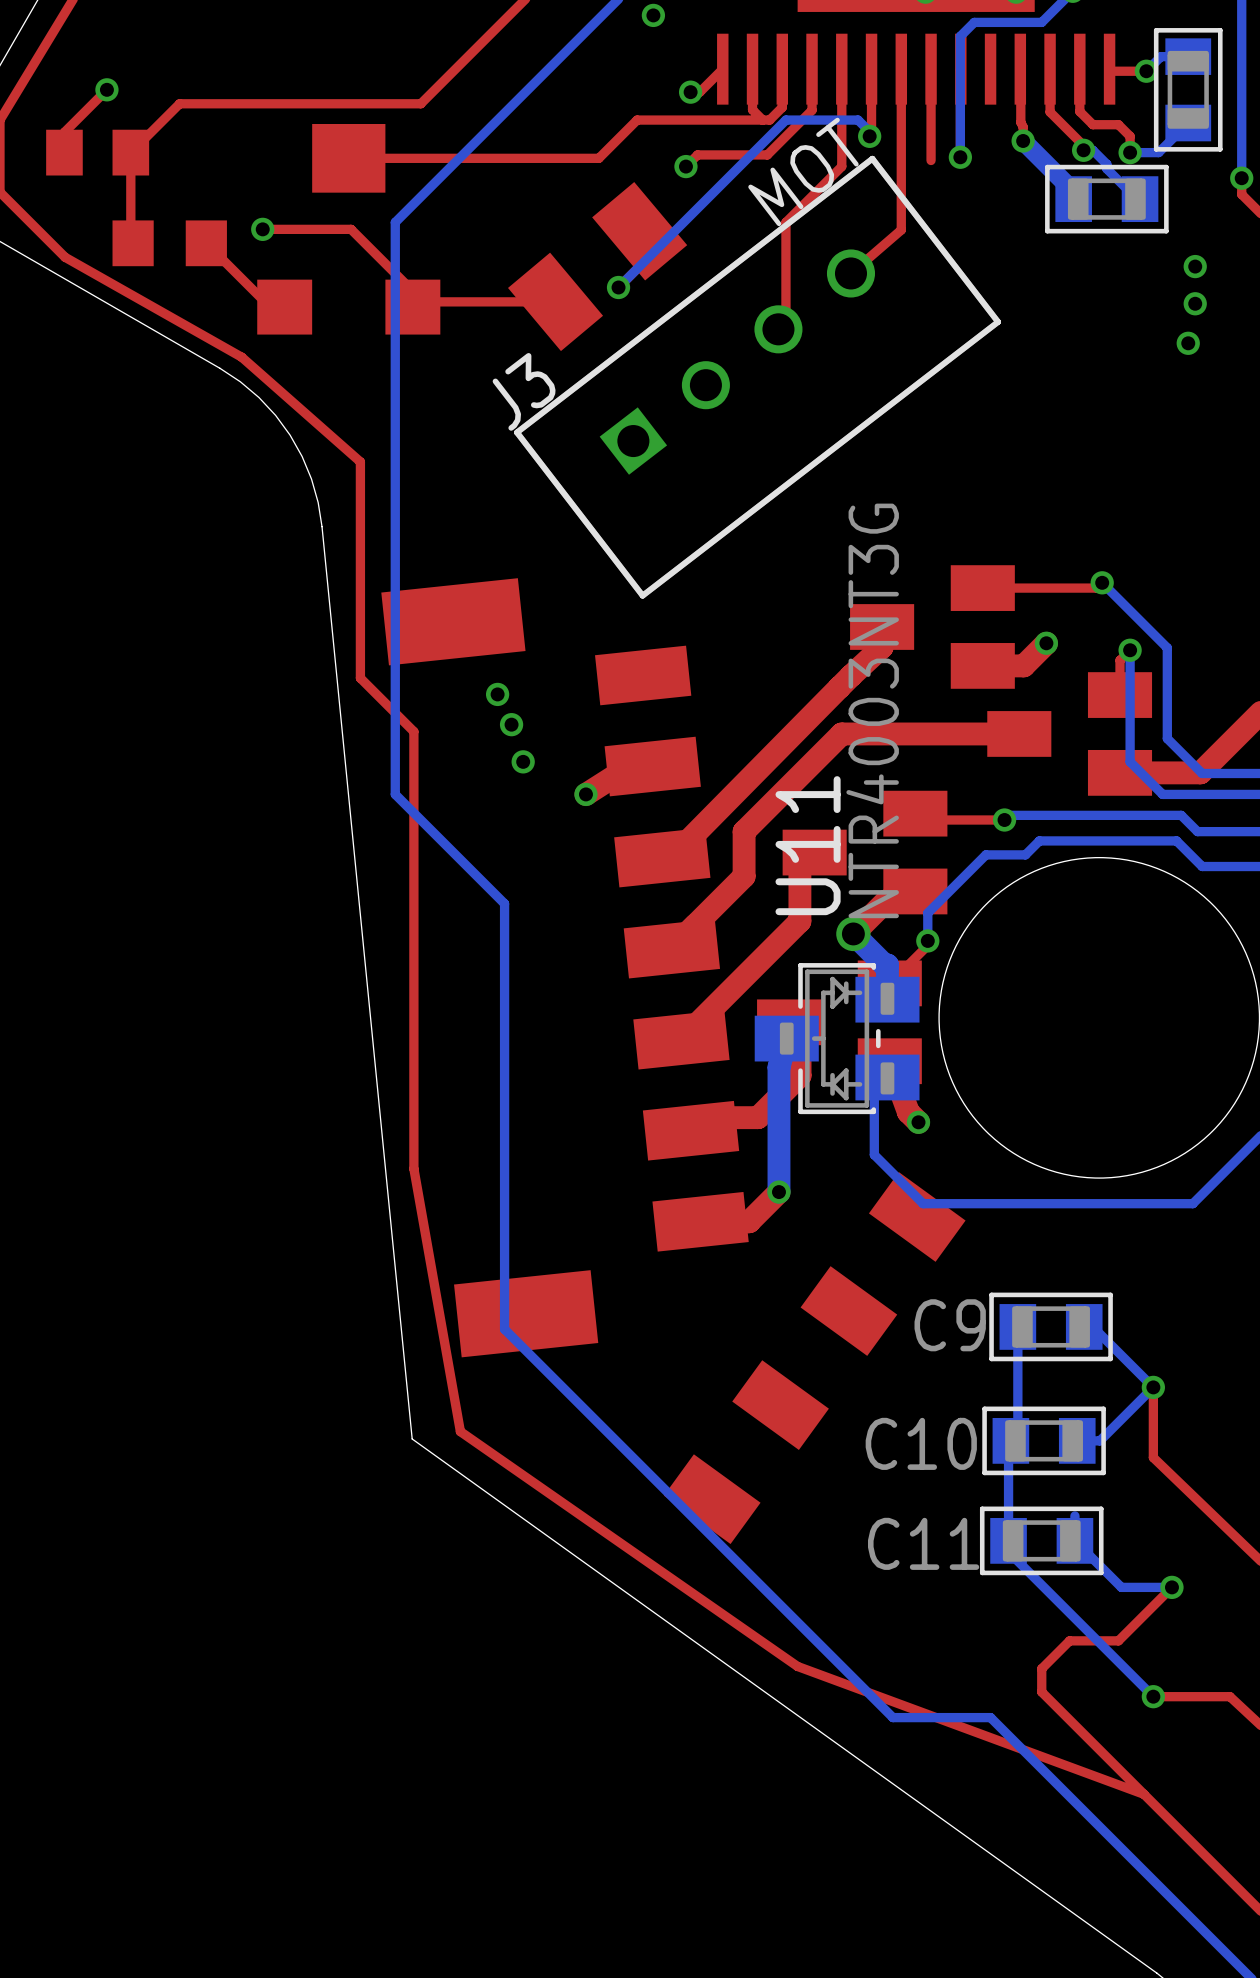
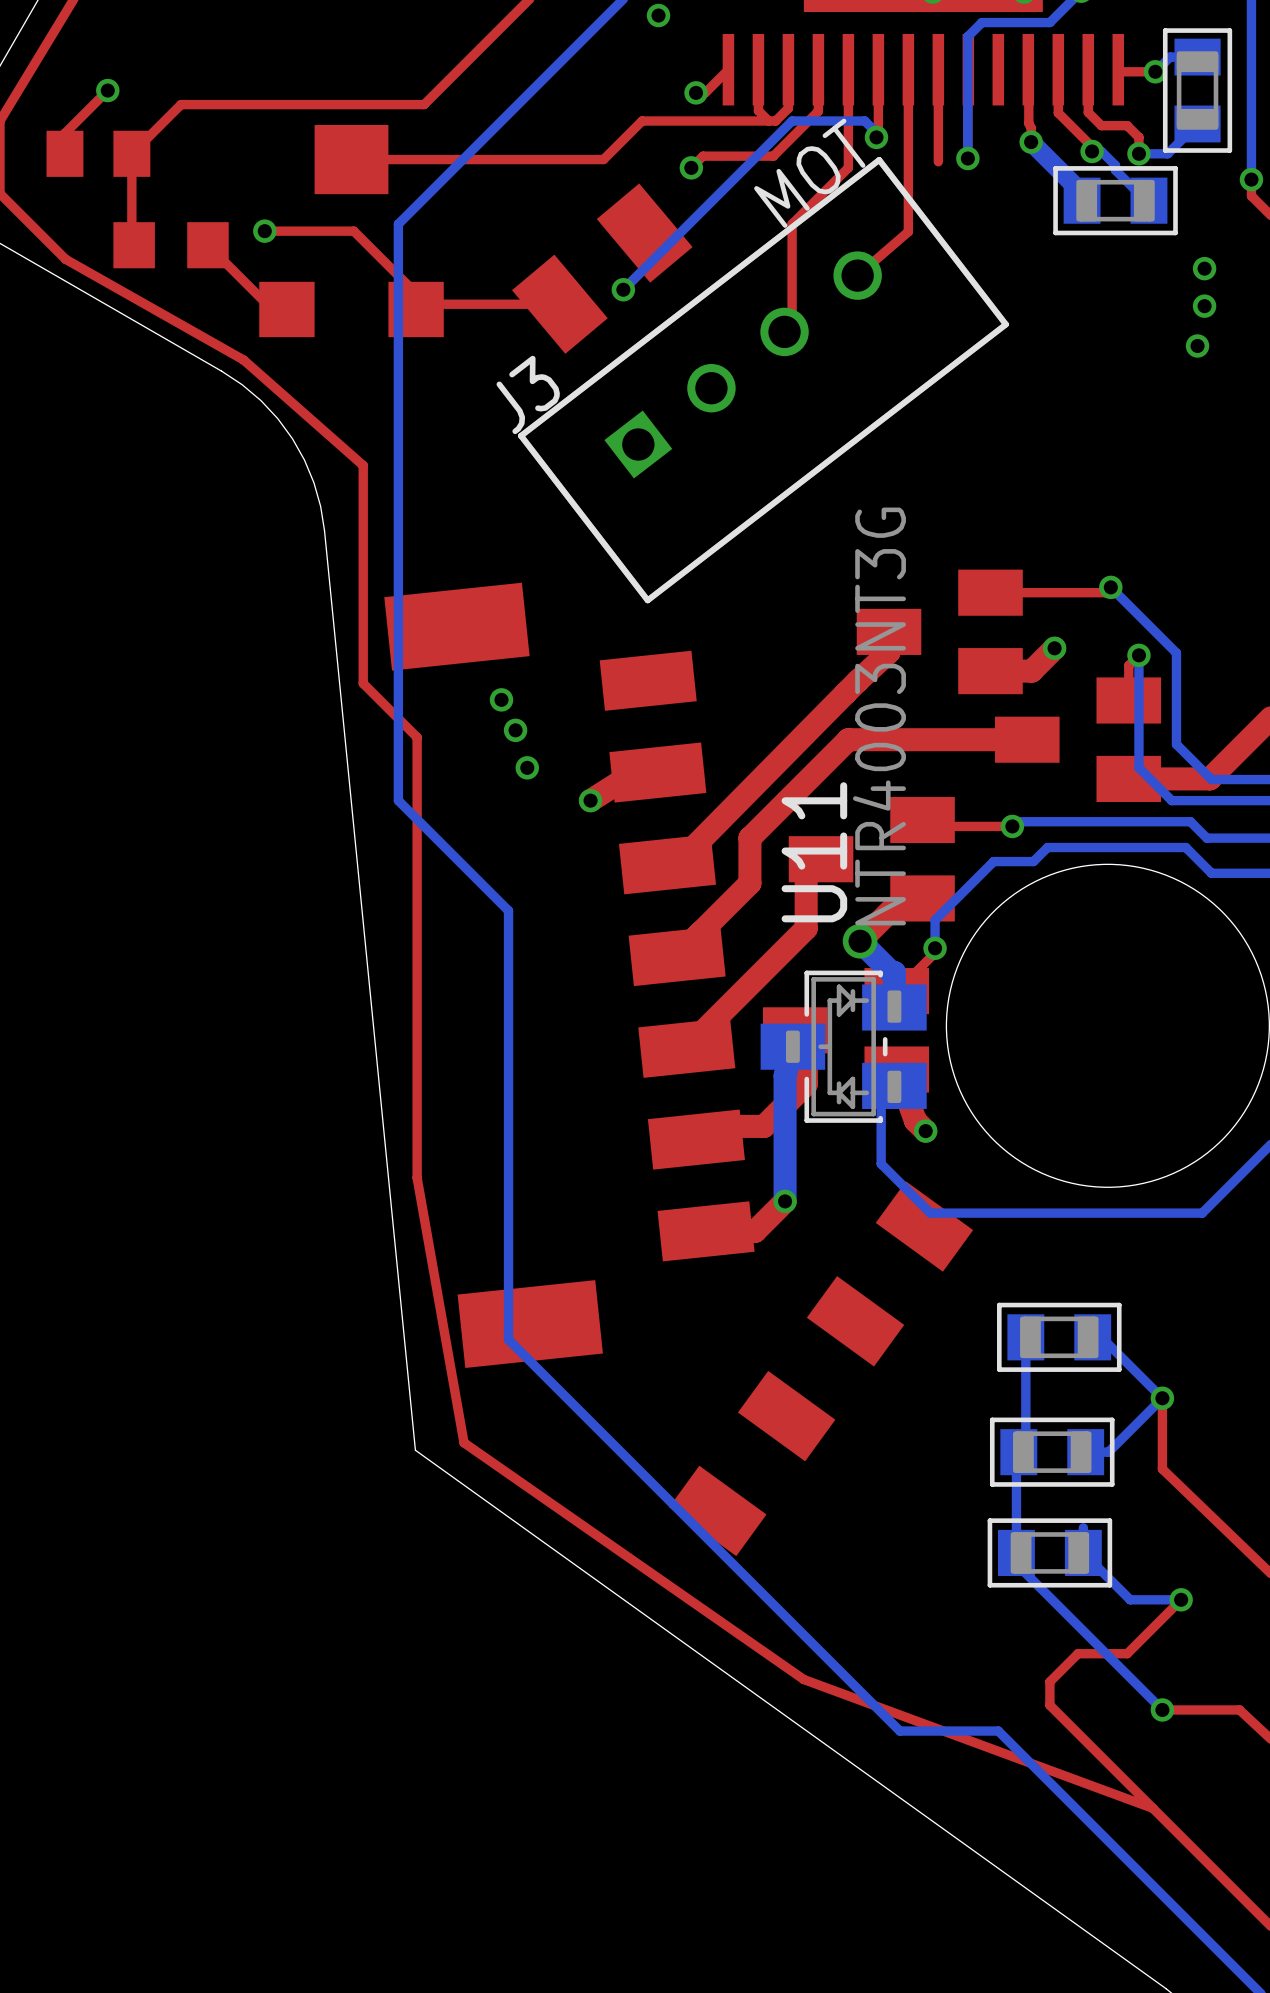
C9 name: C9 (950, 1325) -> none
C10 name: C10 (921, 1443) -> none
C11 name: C11 (923, 1543) -> none

